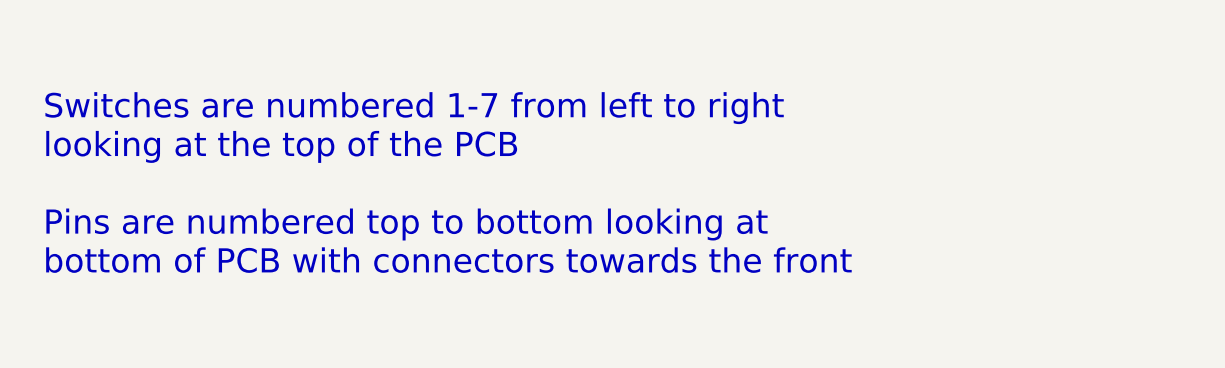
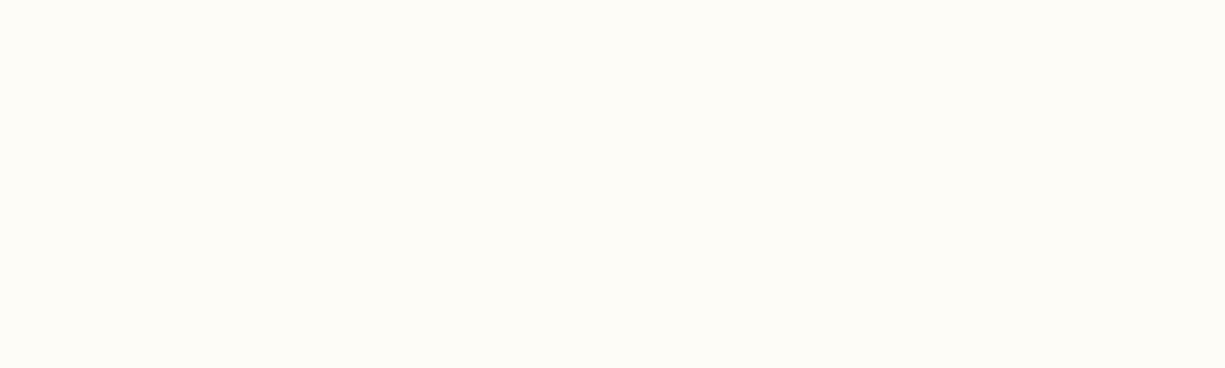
text: Switches are numbered 1-7 from left to right (414, 108) -> none
text: looking at the top of the PCB (281, 146) -> none
text: Pins are numbered top to bottom looking at (407, 224) -> none
text: bottom of PCB with connectors towards the front (448, 260) -> none

